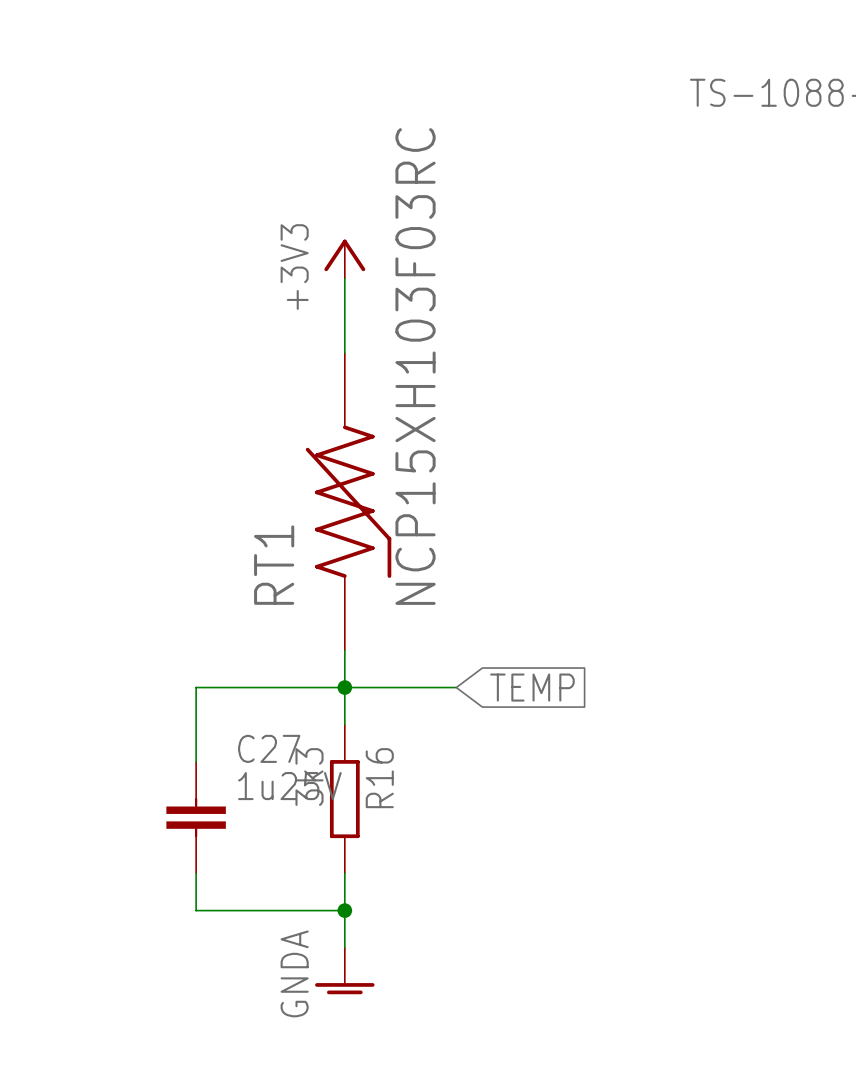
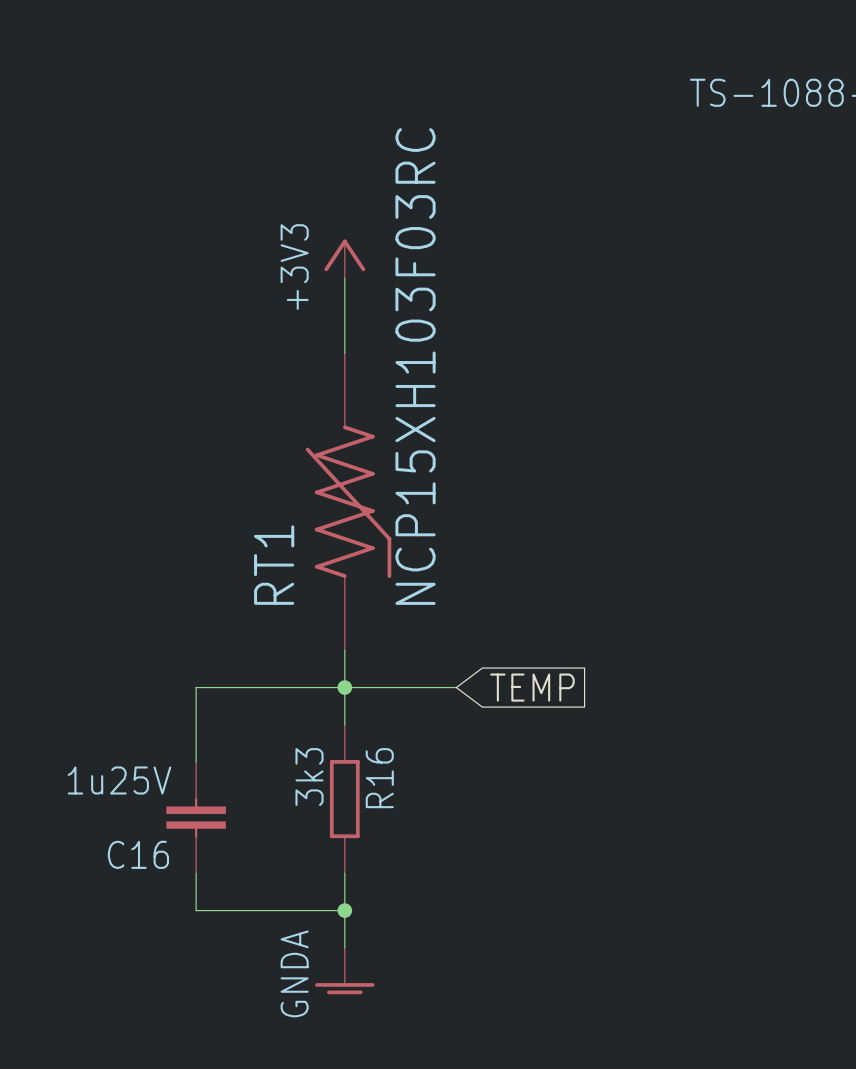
C27 name: C27 (269, 748) -> C16 (138, 854)
C27 value position: 1u25V (289, 786) -> 1u25V (119, 780)

